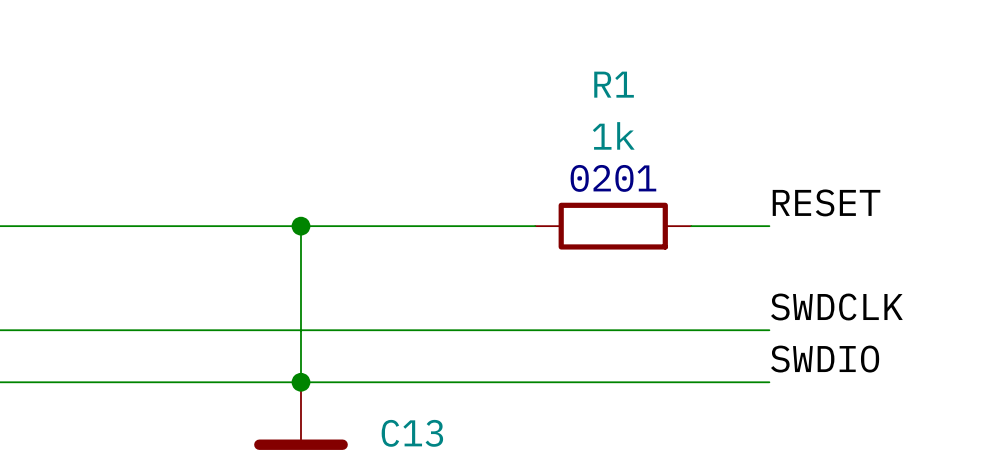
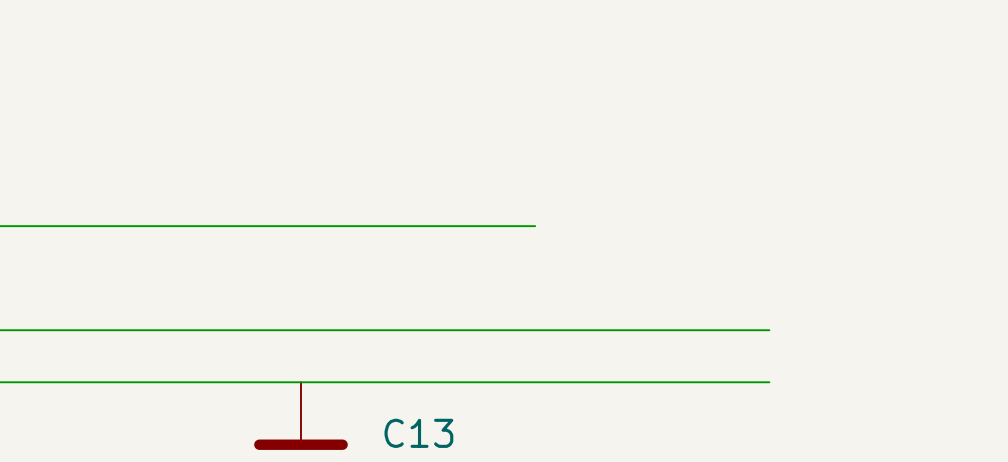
text: 0201 (613, 178) -> none
label: RESET (826, 202) -> none
wire: (300, 226) (300, 382) -> none
junction: (300, 226) -> none
R1: 1k (613, 226) -> none
wire: (691, 226) (769, 226) -> none
label: SWDCLK (836, 307) -> none
label: SWDIO (825, 359) -> none
junction: (300, 382) -> none

